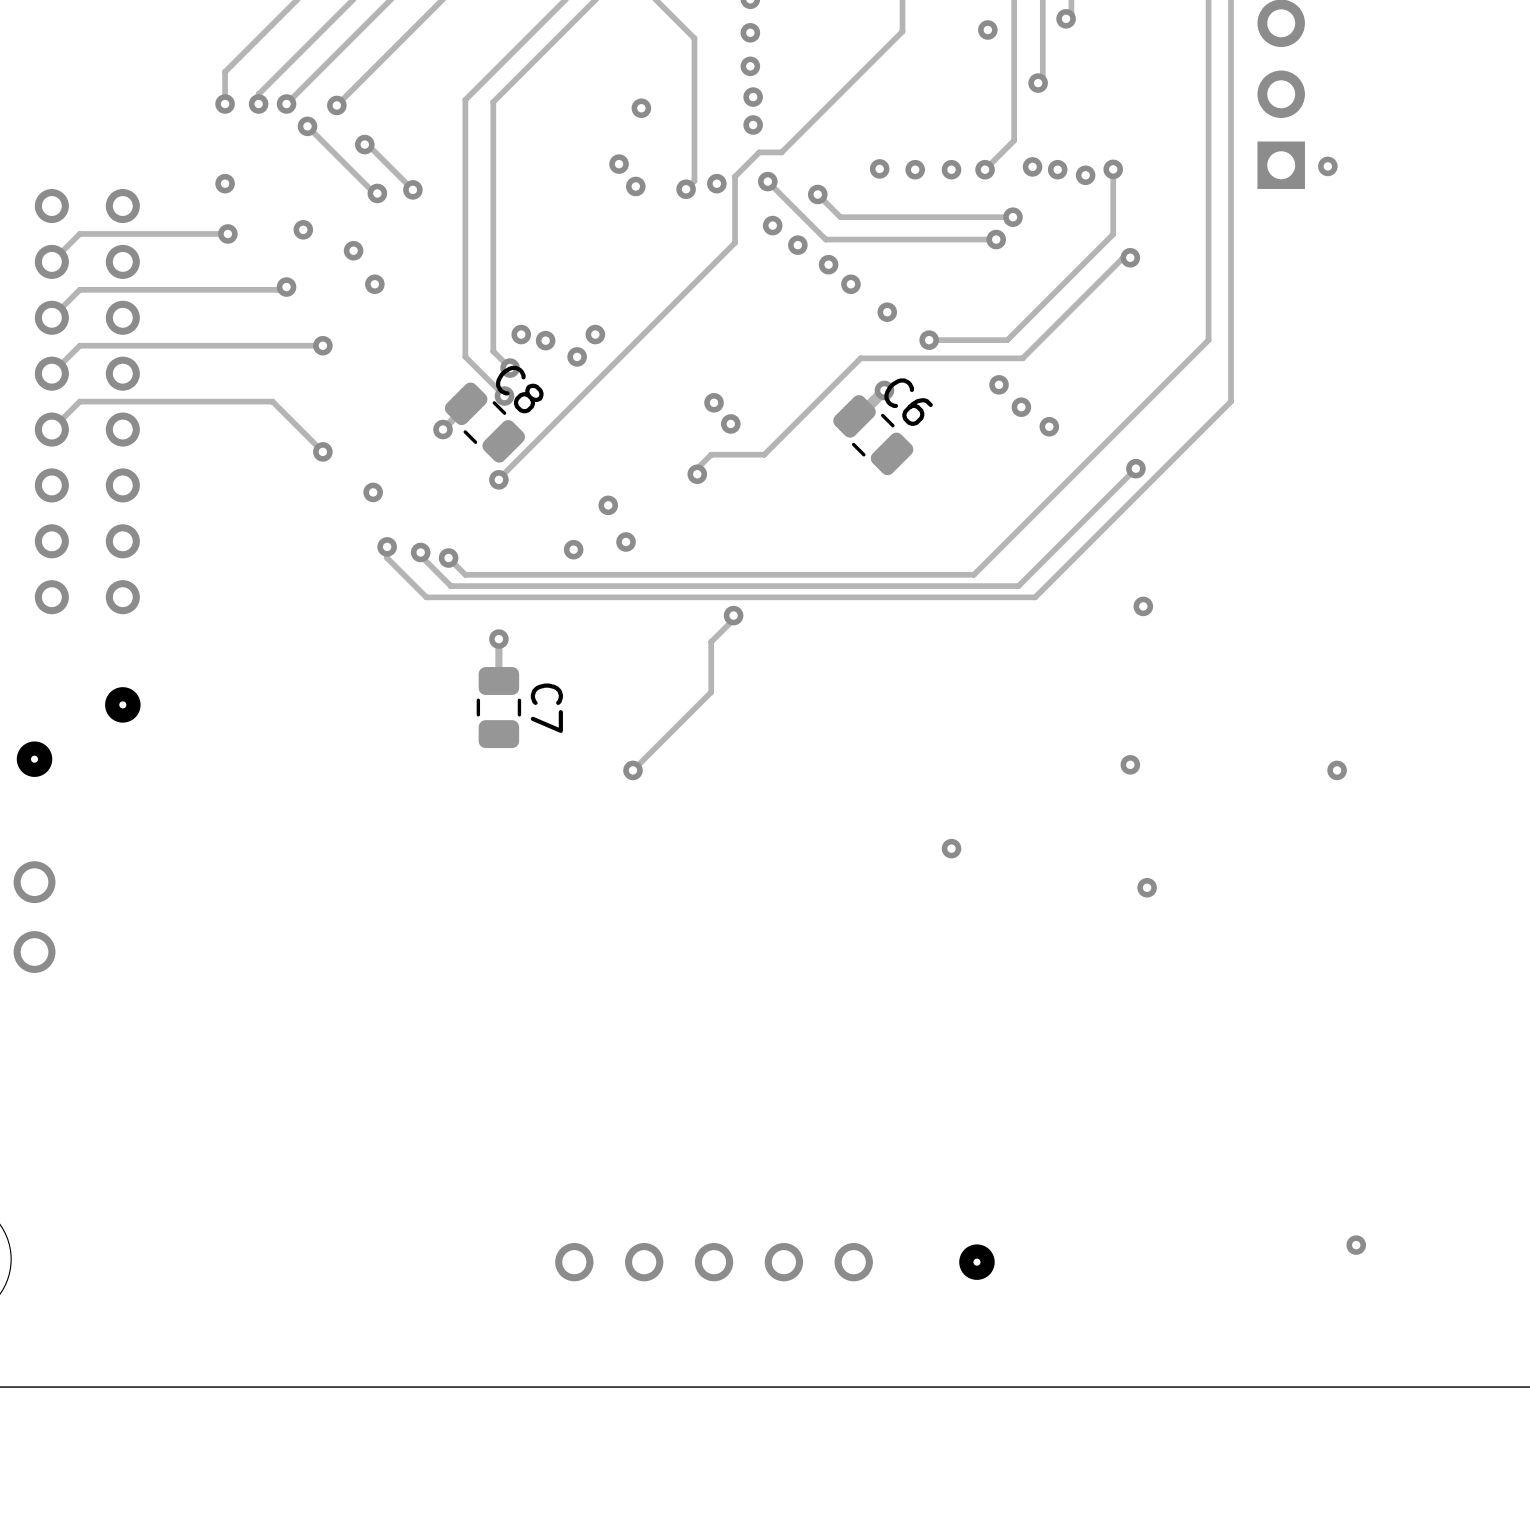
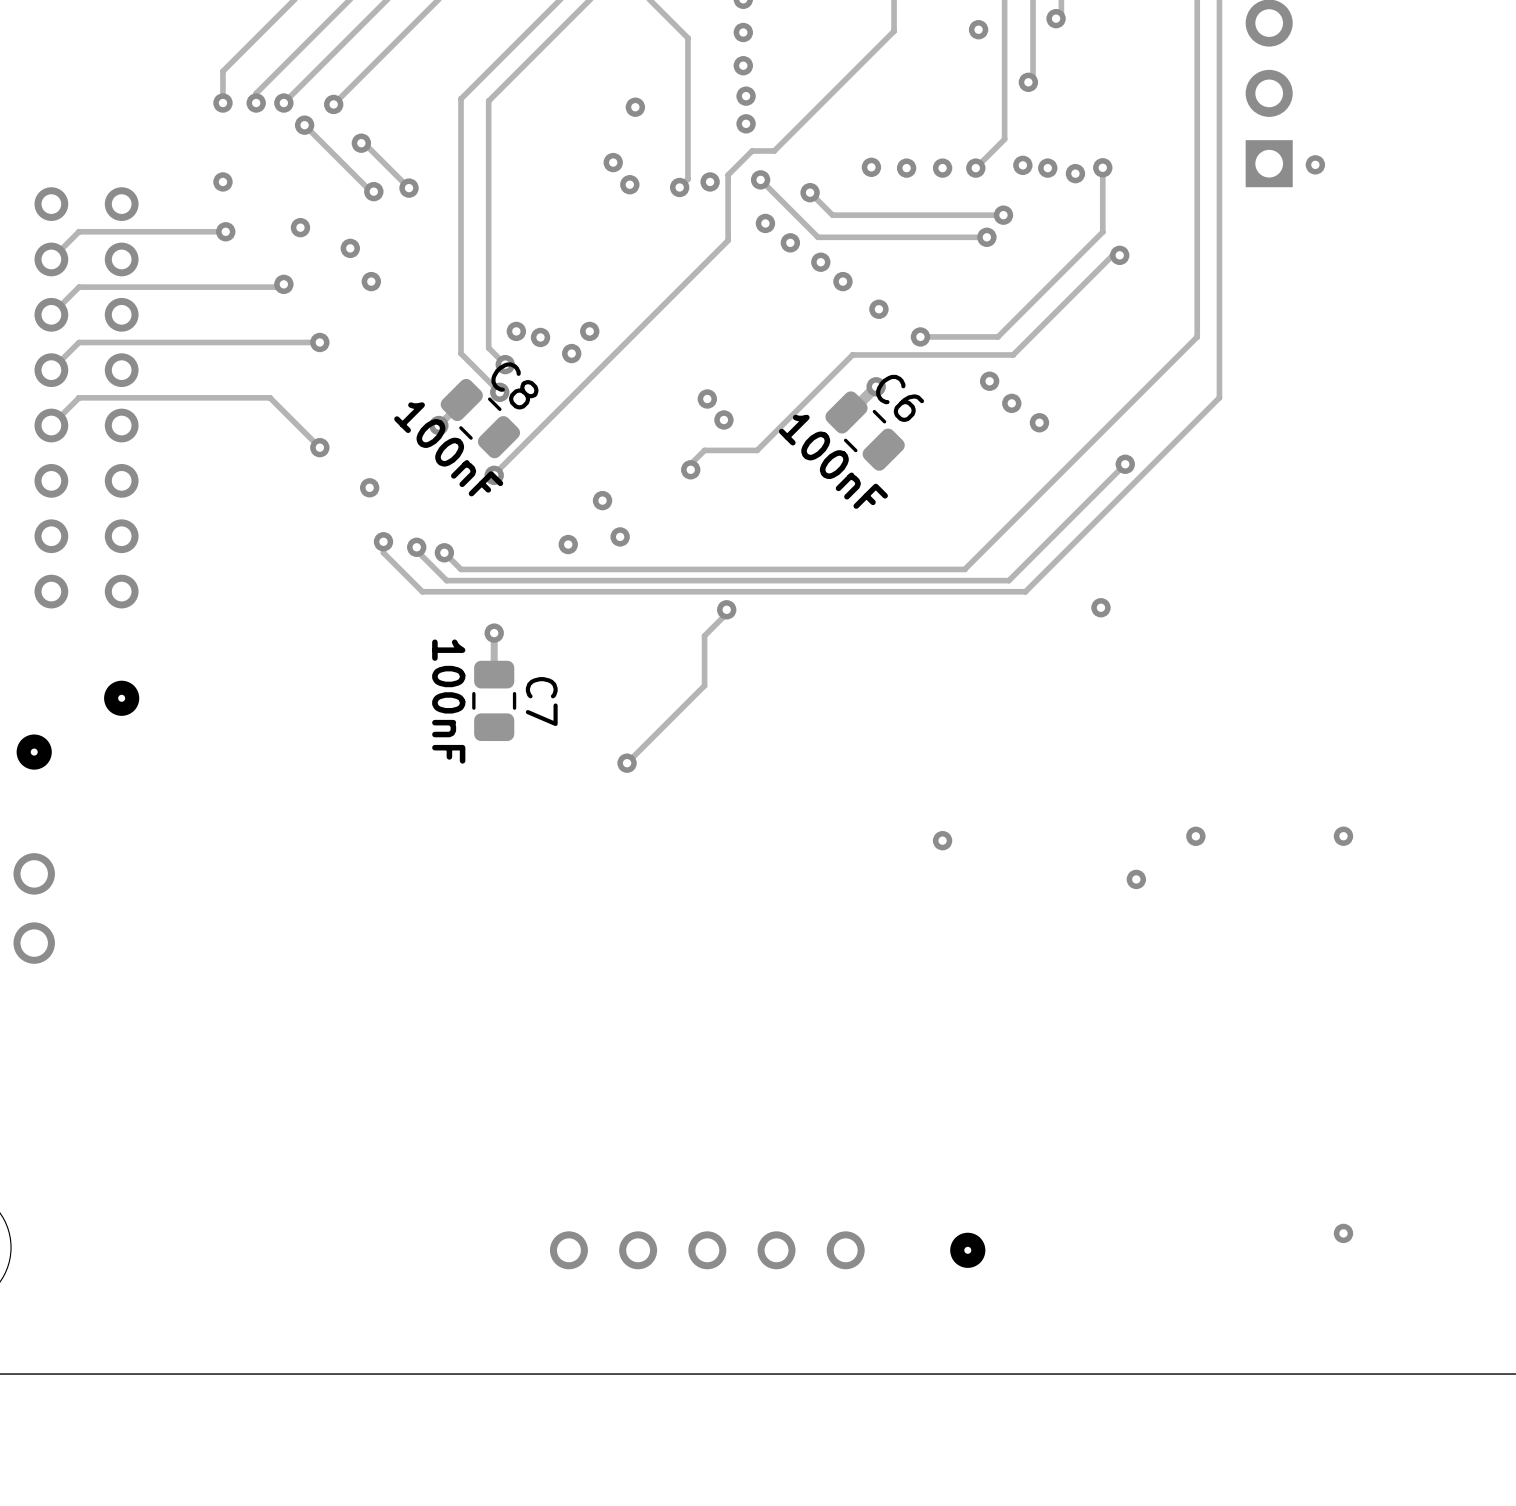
C8 value: none -> 100nF (448, 449)
C6 value: none -> 100nF (833, 461)
via position: (1143, 606) -> (1100, 607)
C7 value: none -> 100nF (448, 701)
via: (1130, 764) -> none
via: (1337, 770) -> none
via: none -> (1195, 836)
via: none -> (1343, 836)

